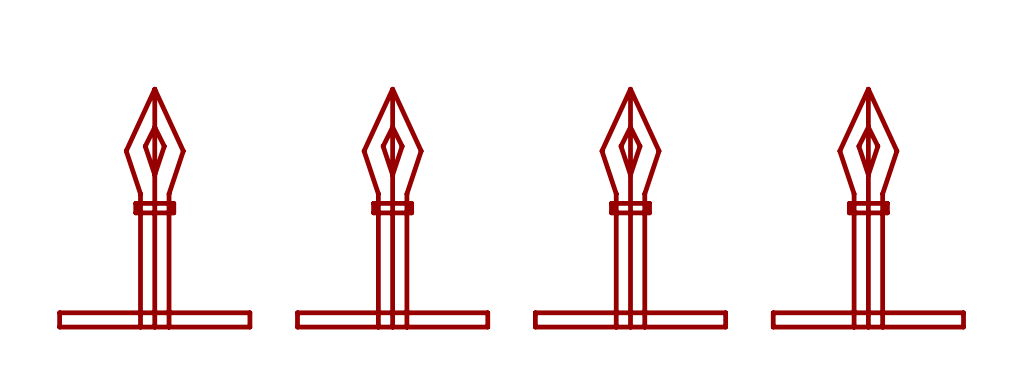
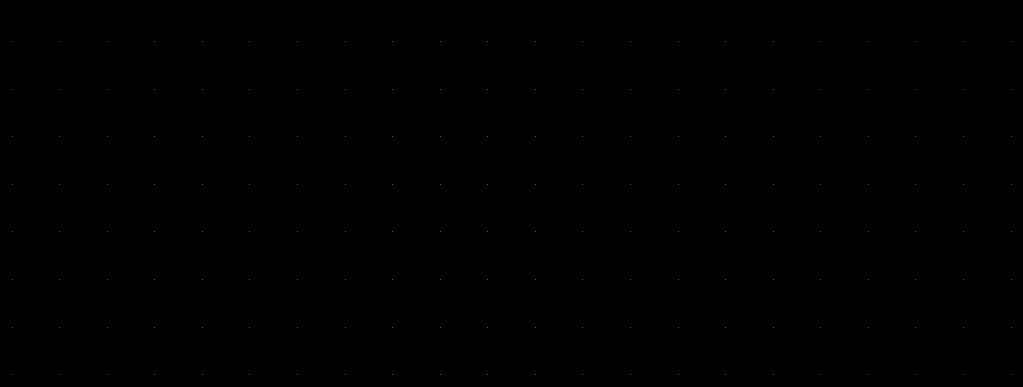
part: (154, 208) -> none
part: (392, 208) -> none
part: (630, 208) -> none
part: (868, 208) -> none

